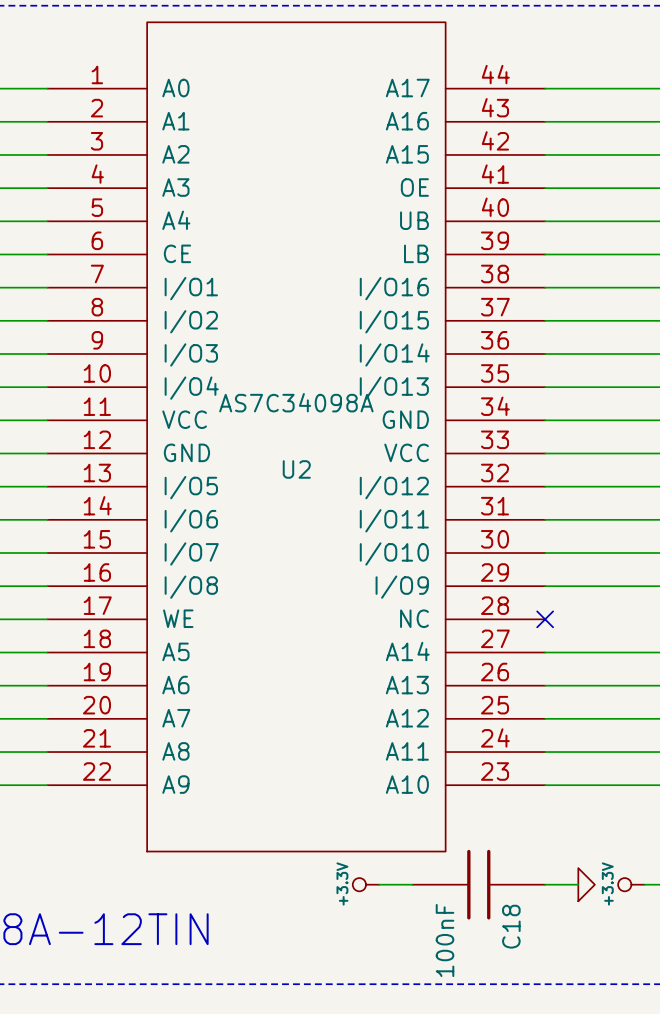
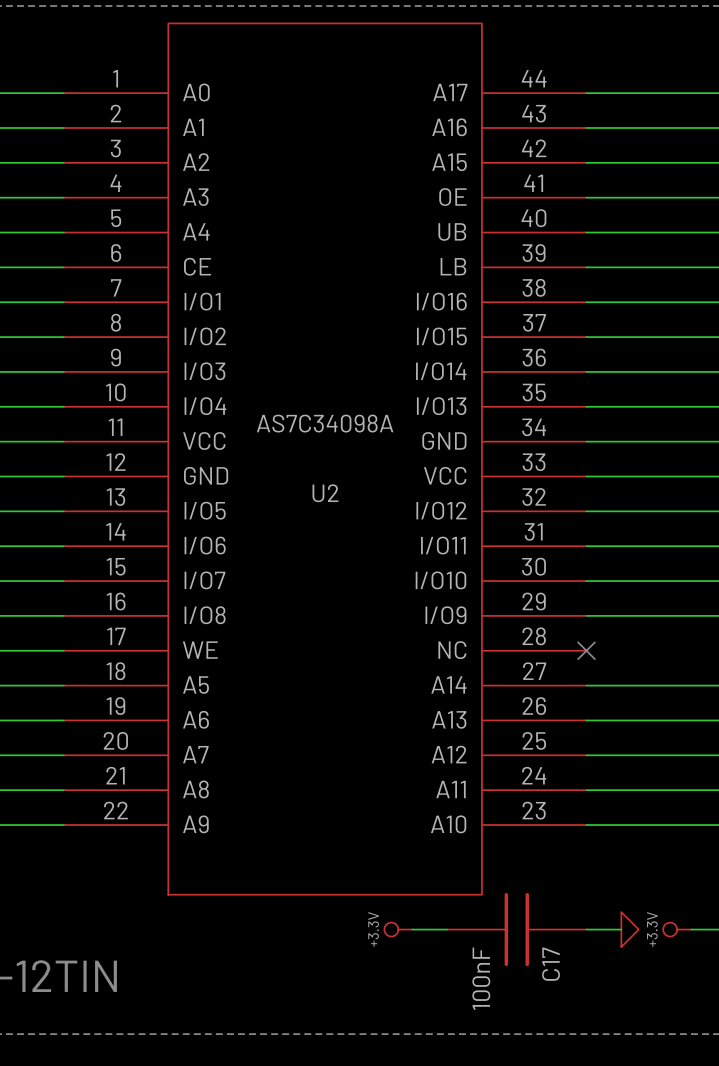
C18 name: C18 (511, 926) -> C17 (551, 964)

